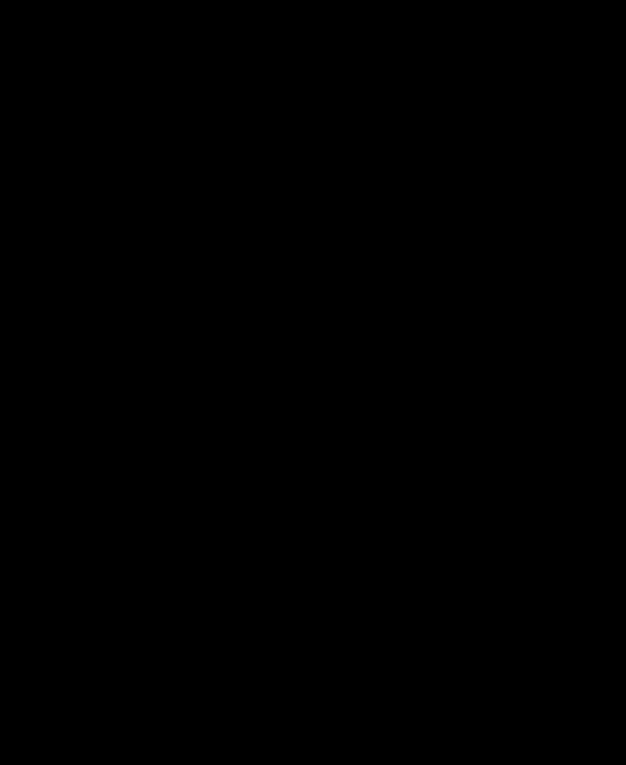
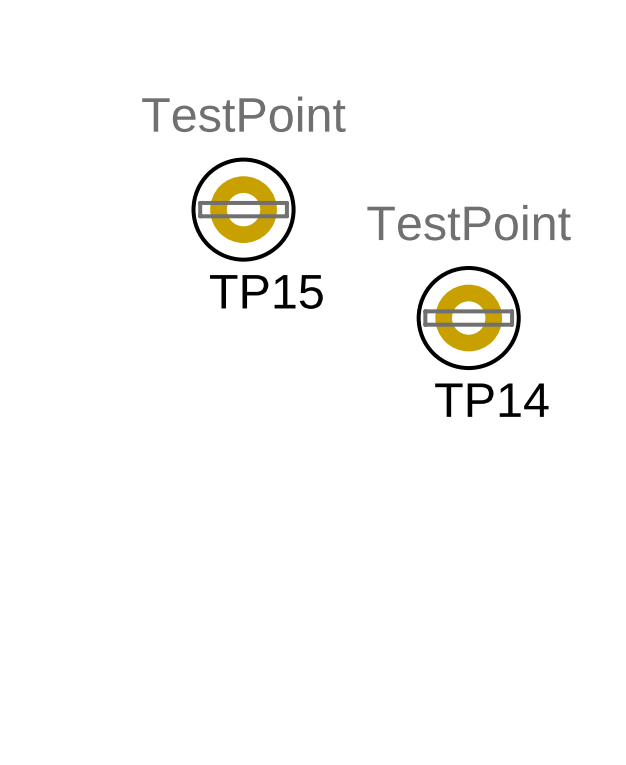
TP15: none -> TestPoint (243, 209)
TP14: none -> TestPoint (468, 318)

